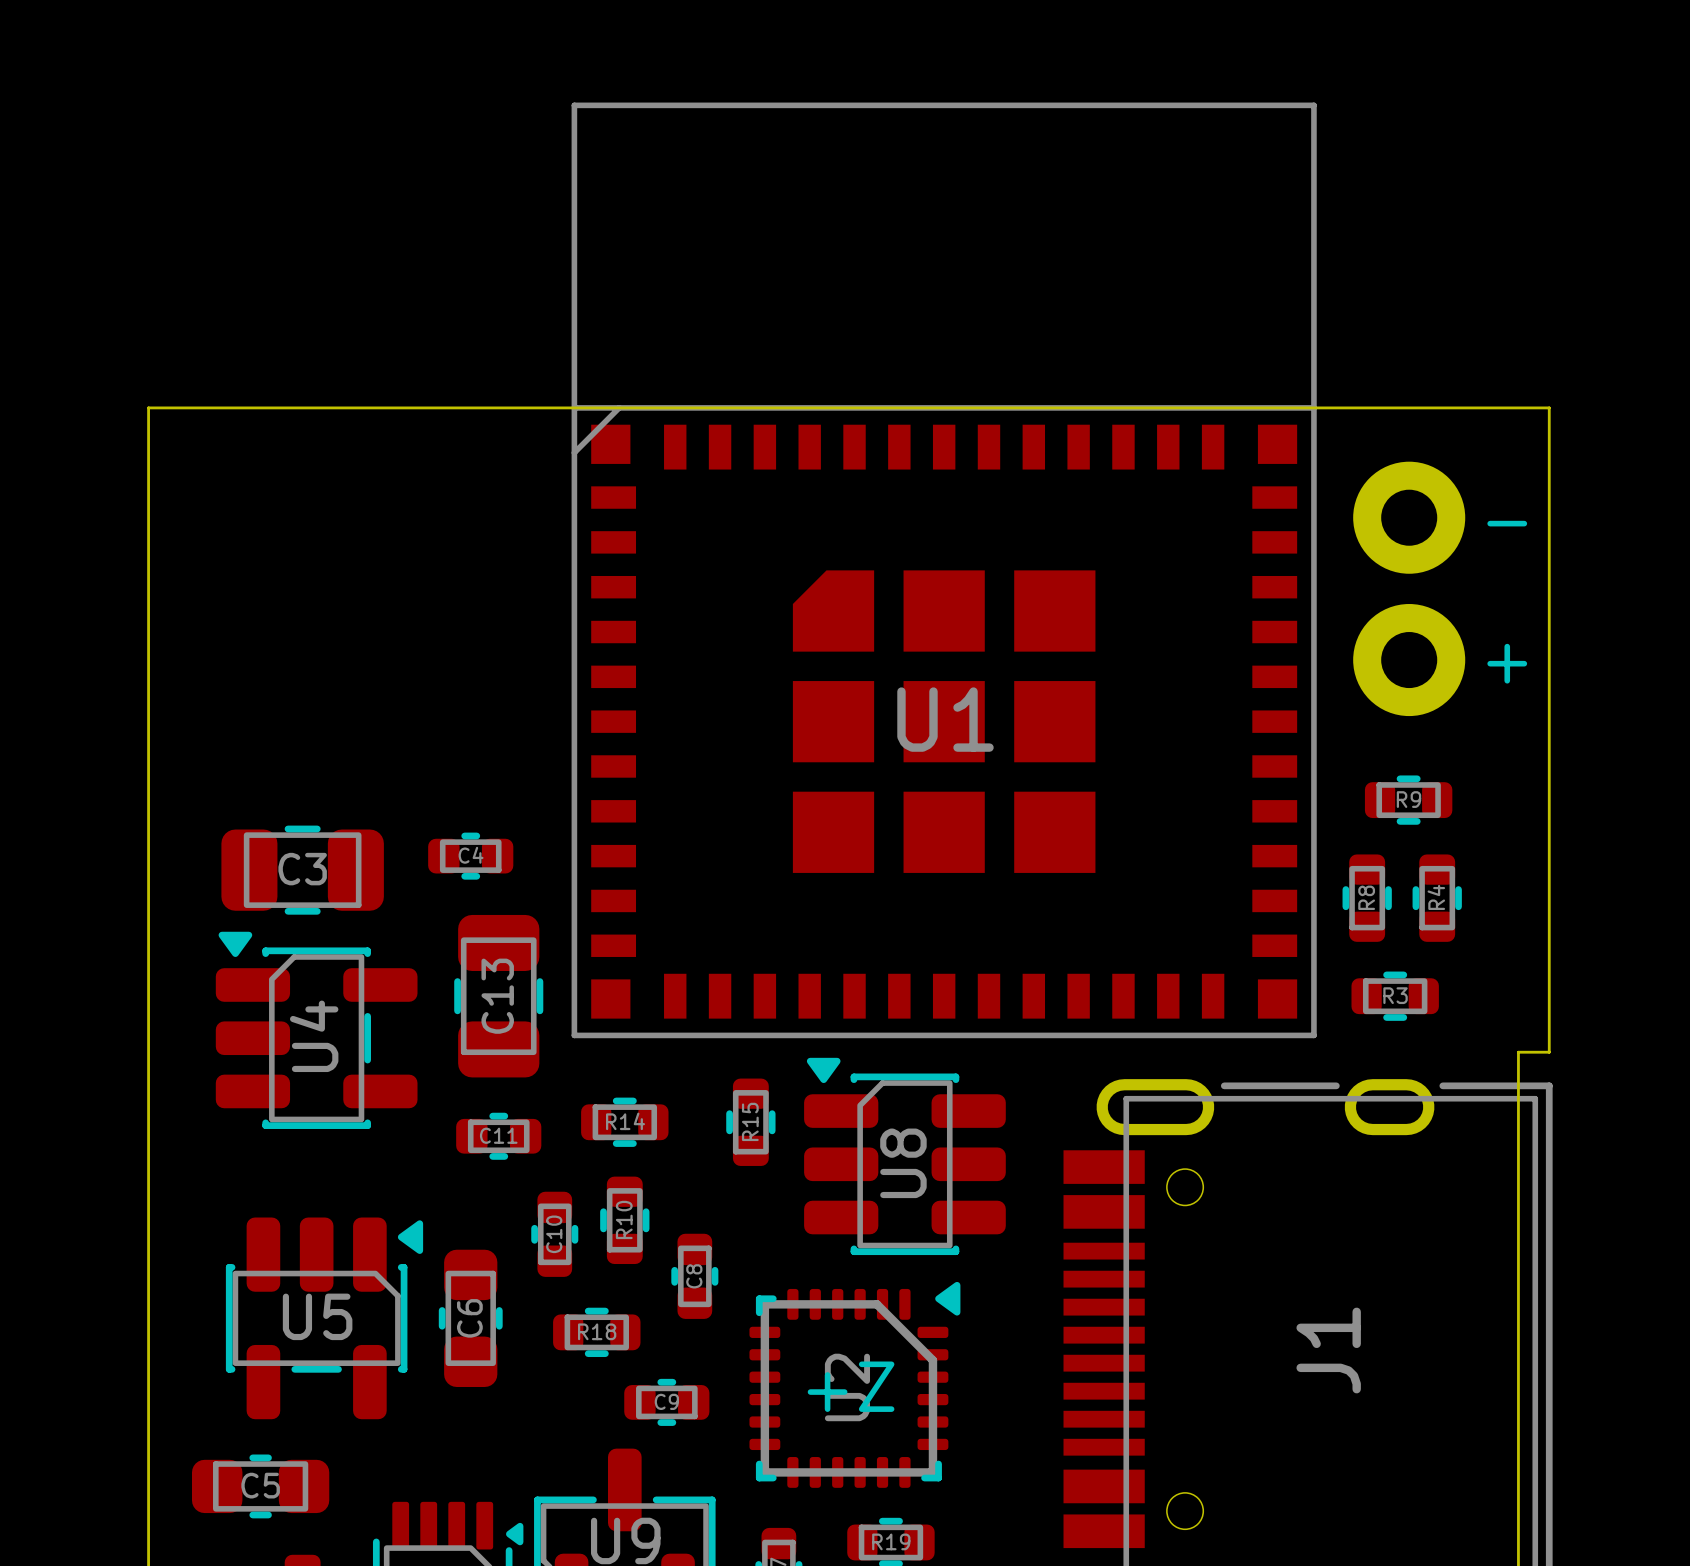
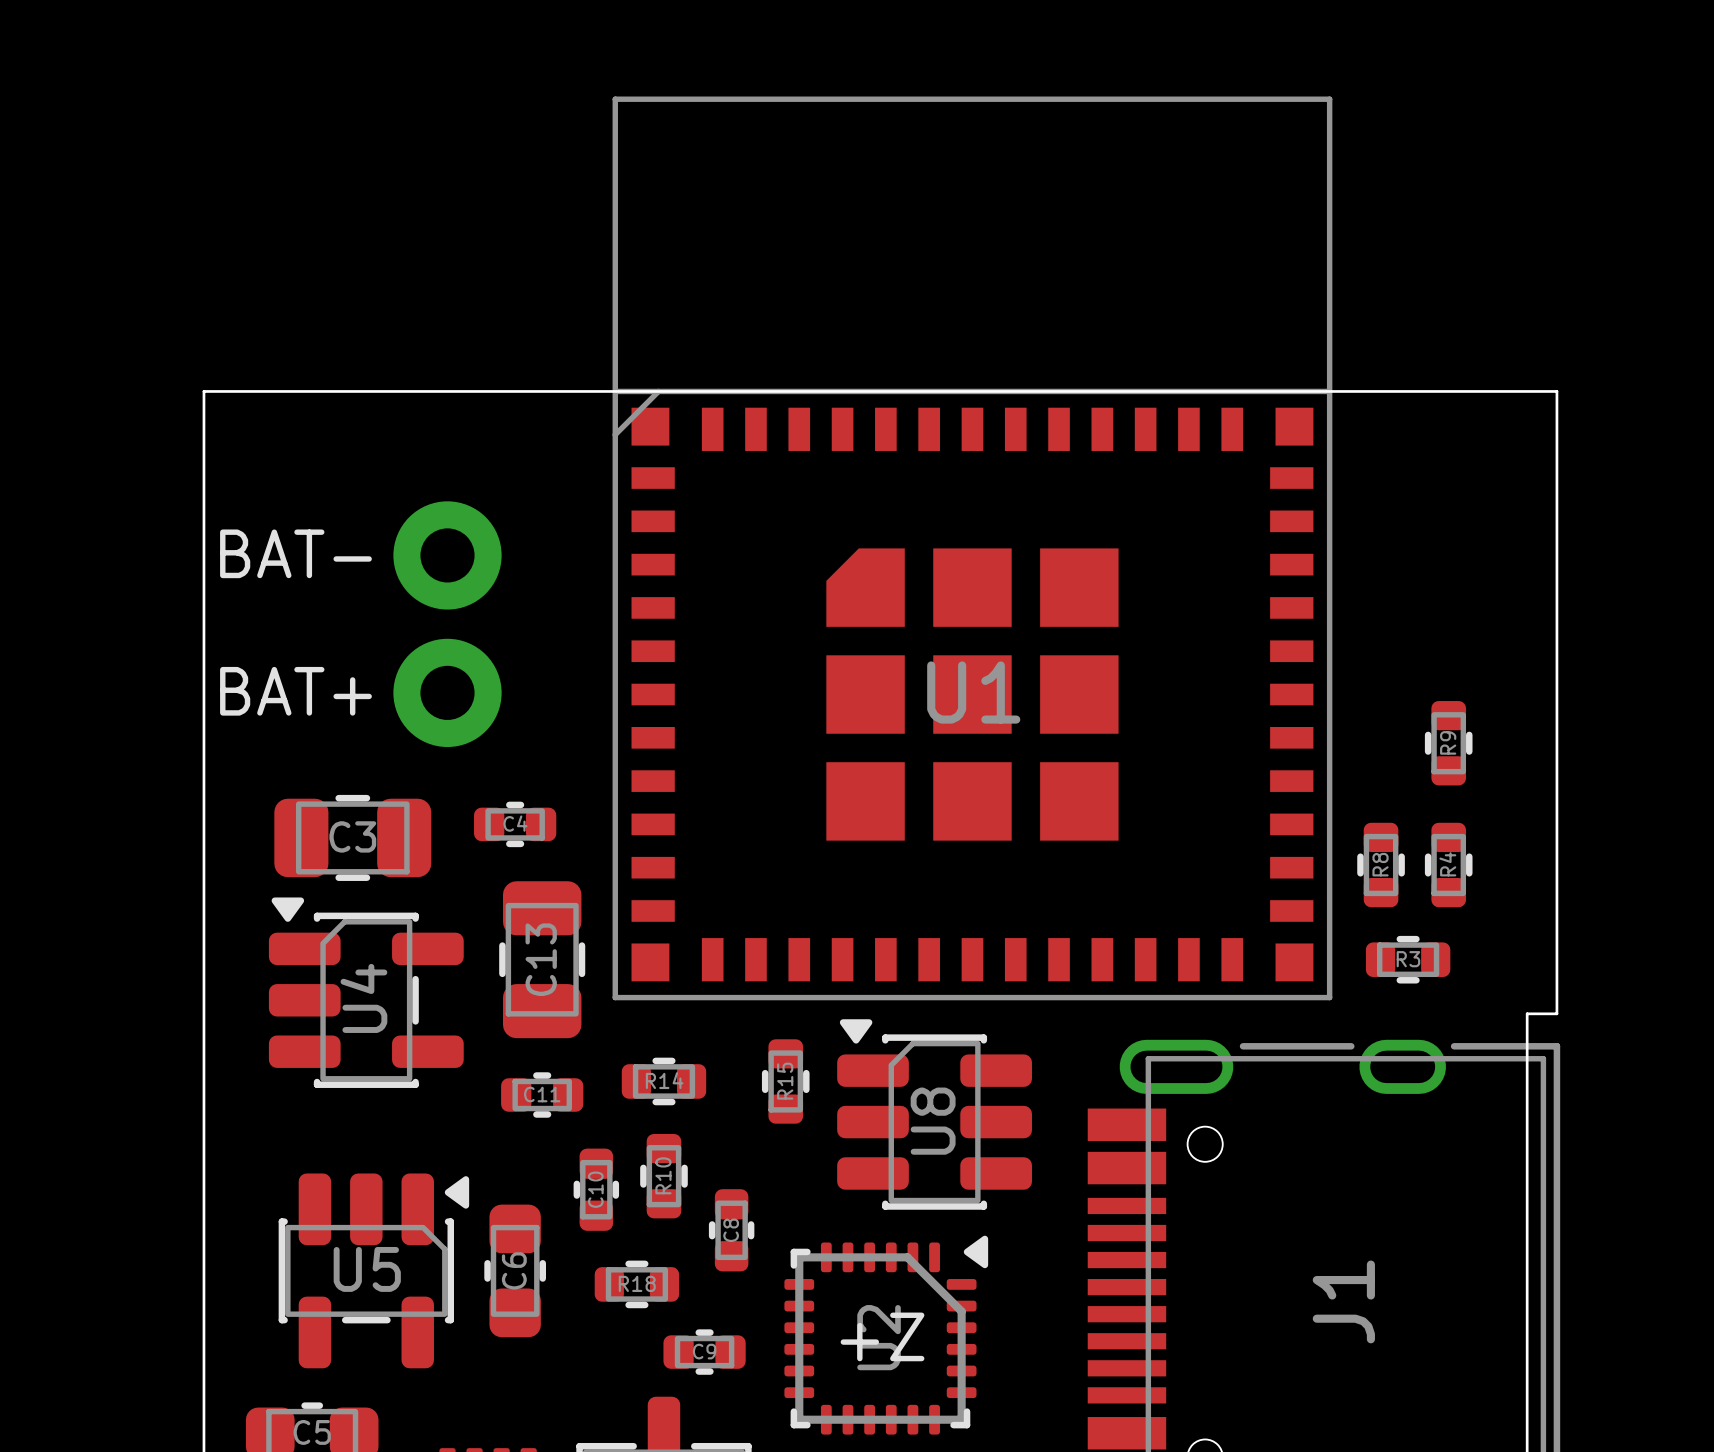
text: - (1507, 523) -> none
text: none -> BAT- (295, 553)
part position: (1409, 588) -> (447, 624)
text: + (1507, 663) -> none
text: none -> BAT+ (295, 691)
R9 rotation: 0° (1408, 800) -> 90° clockwise (1448, 743)

